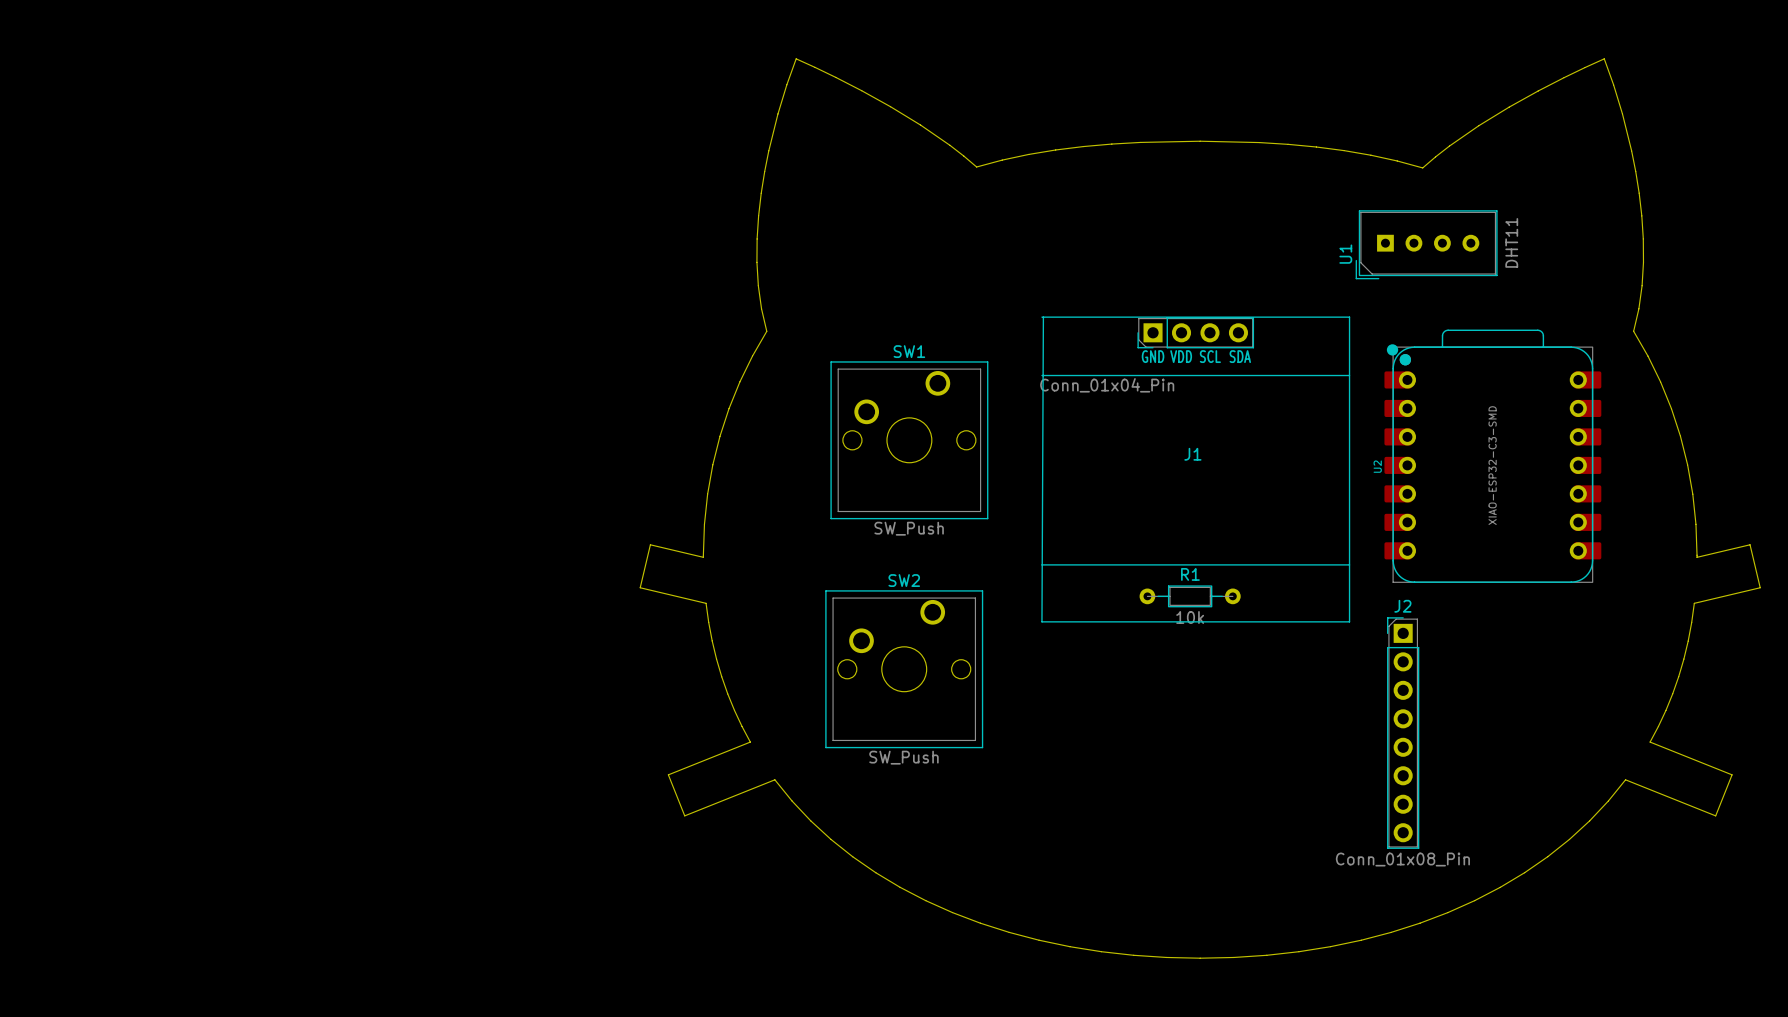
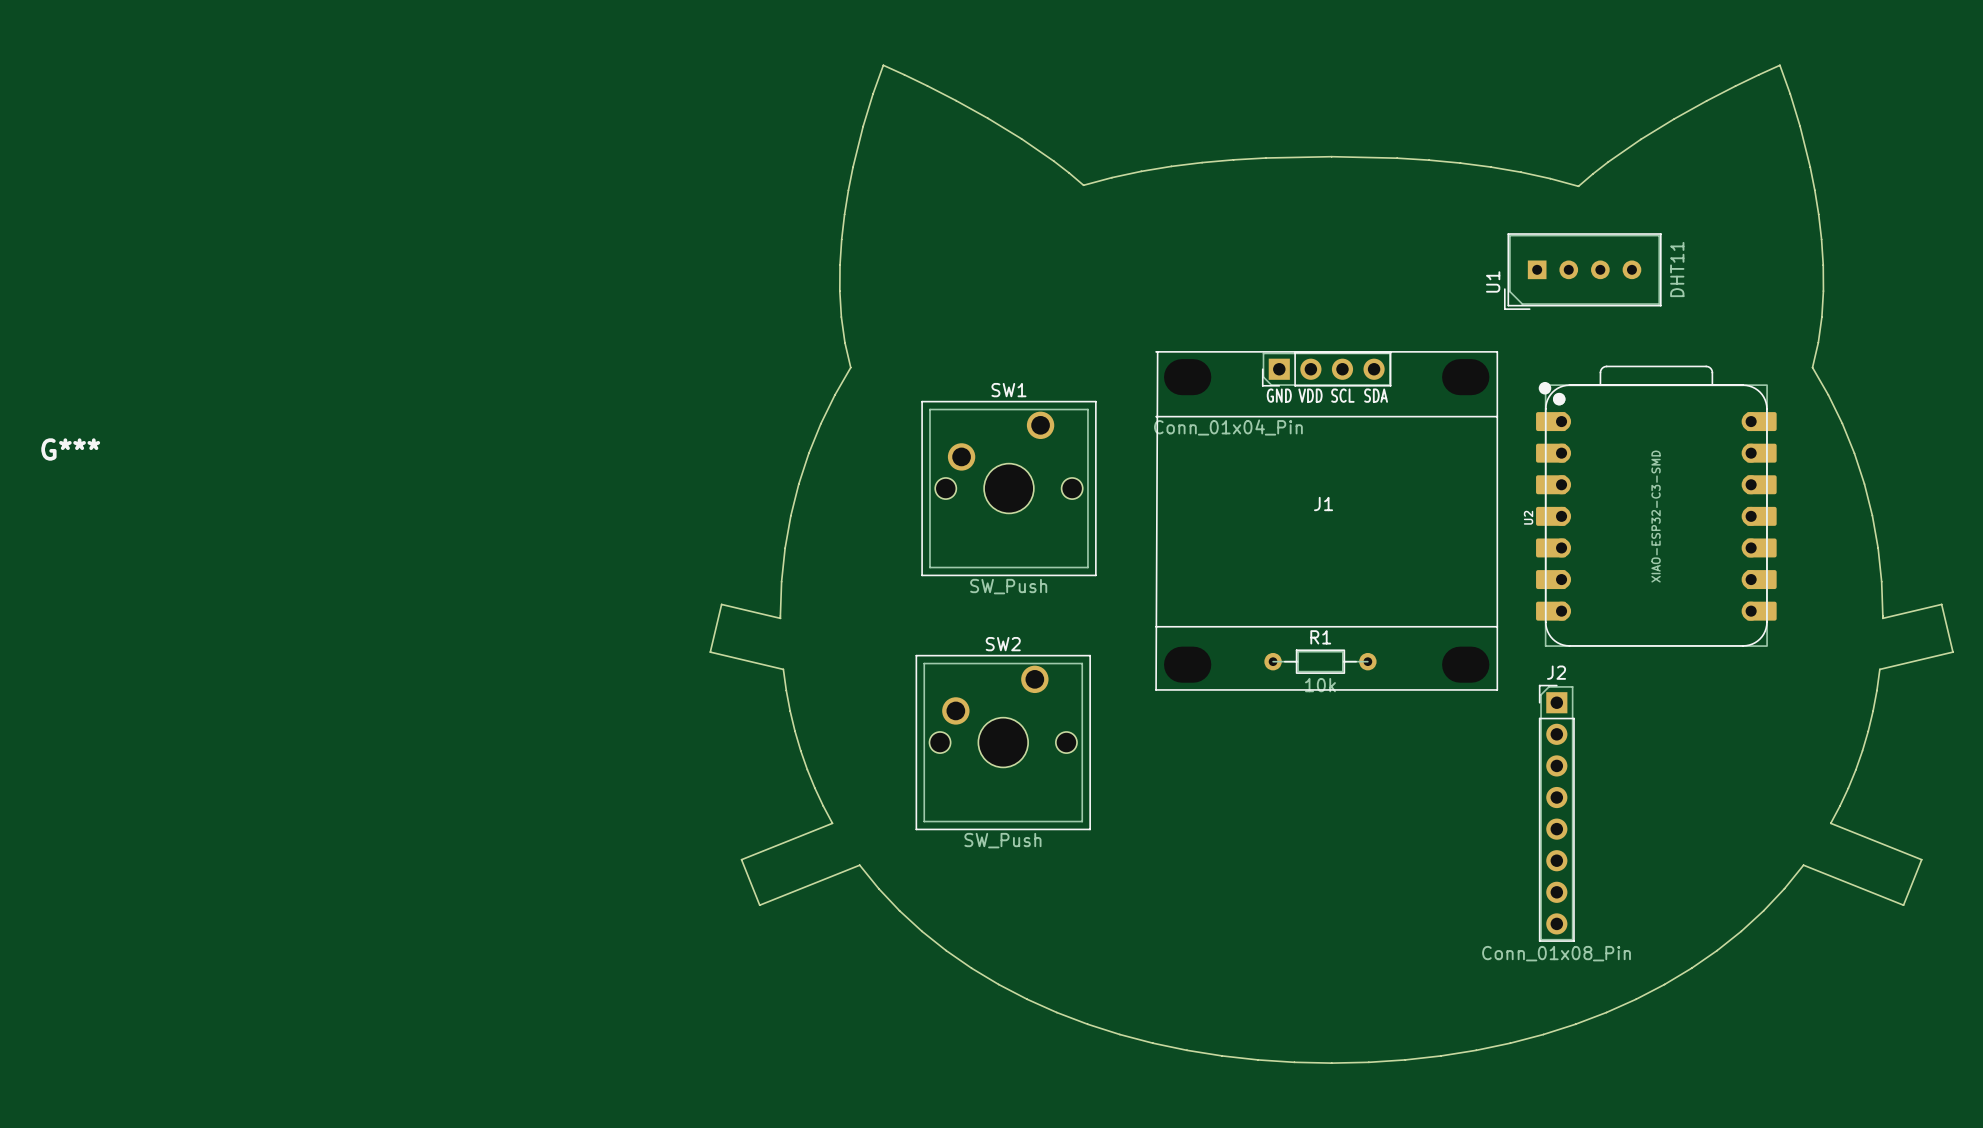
G***: none -> (70, 449)

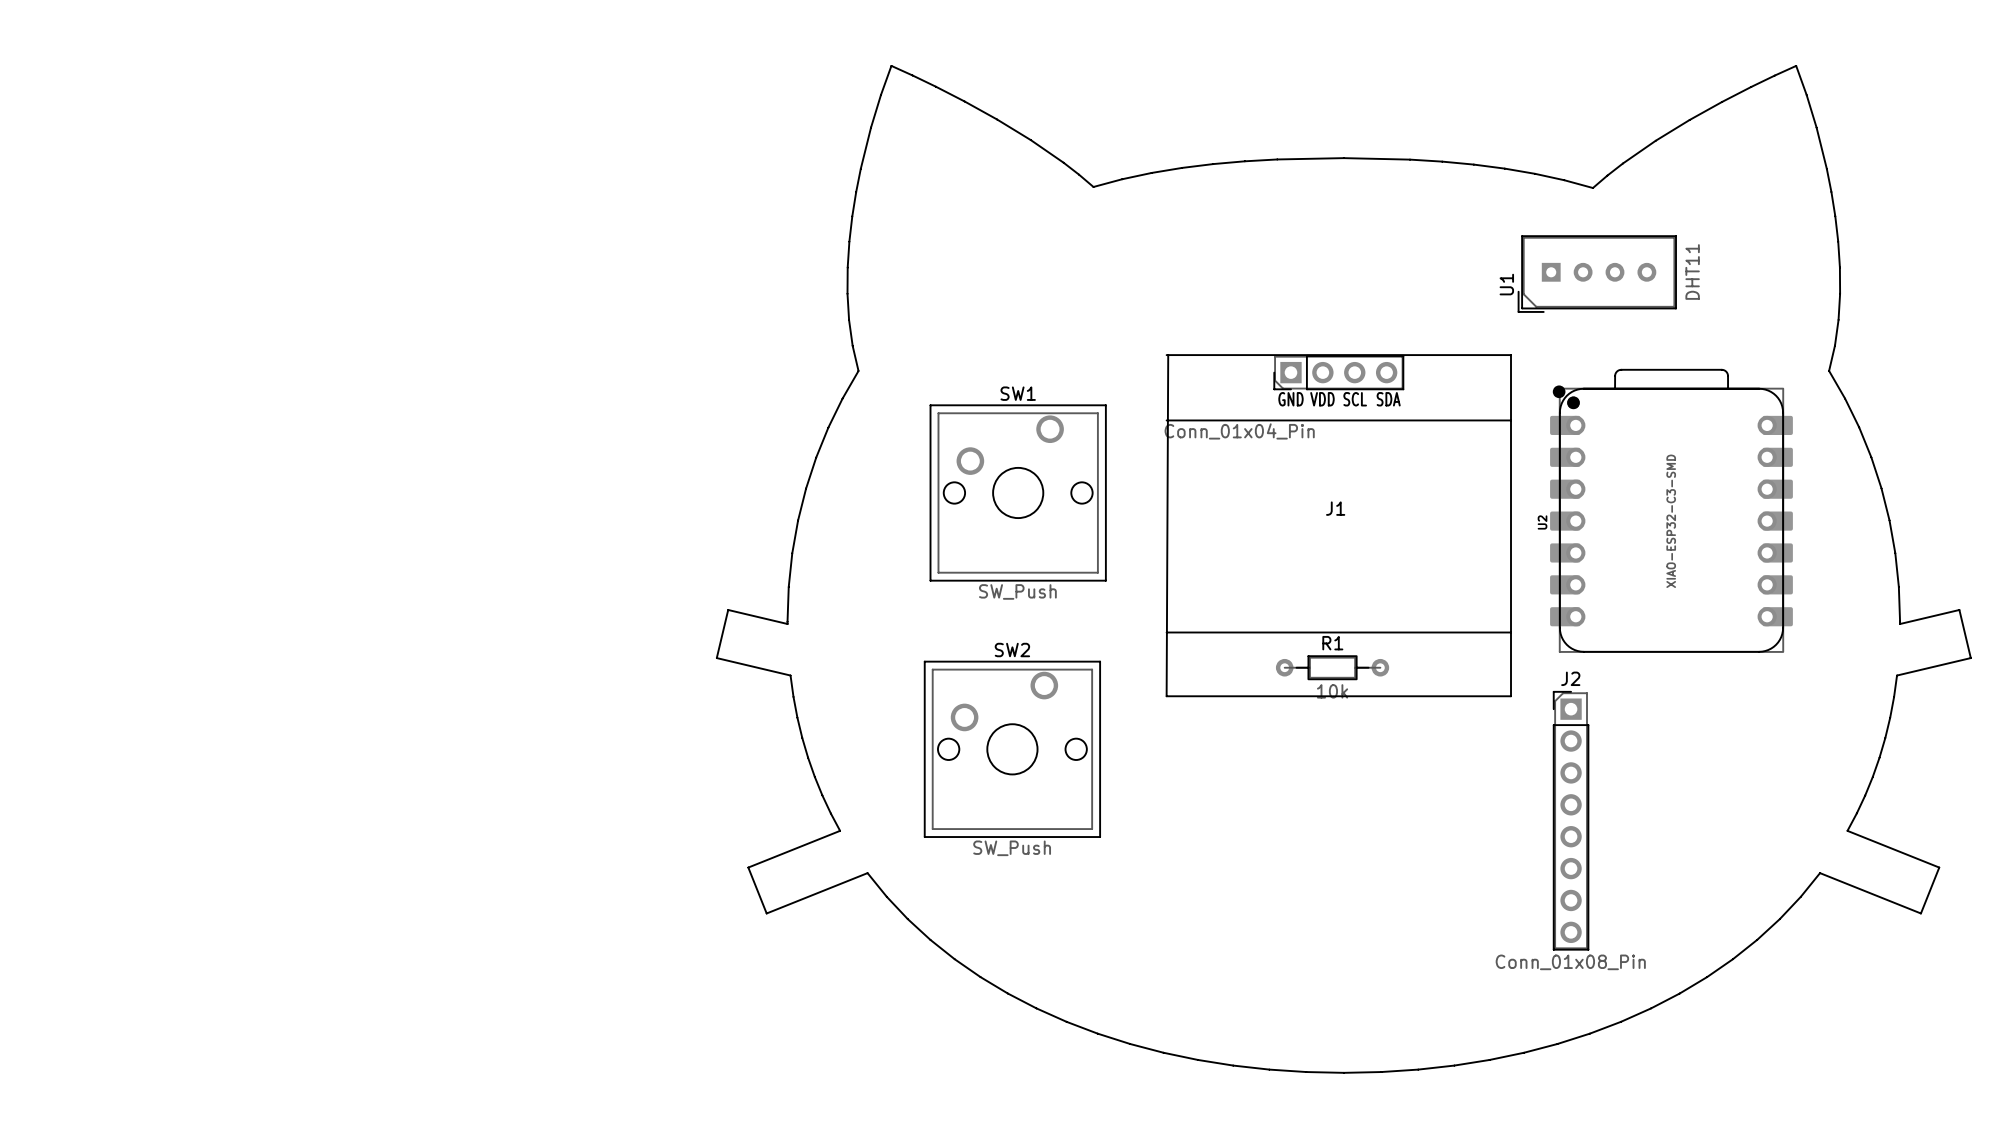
G***: (70, 449) -> none

